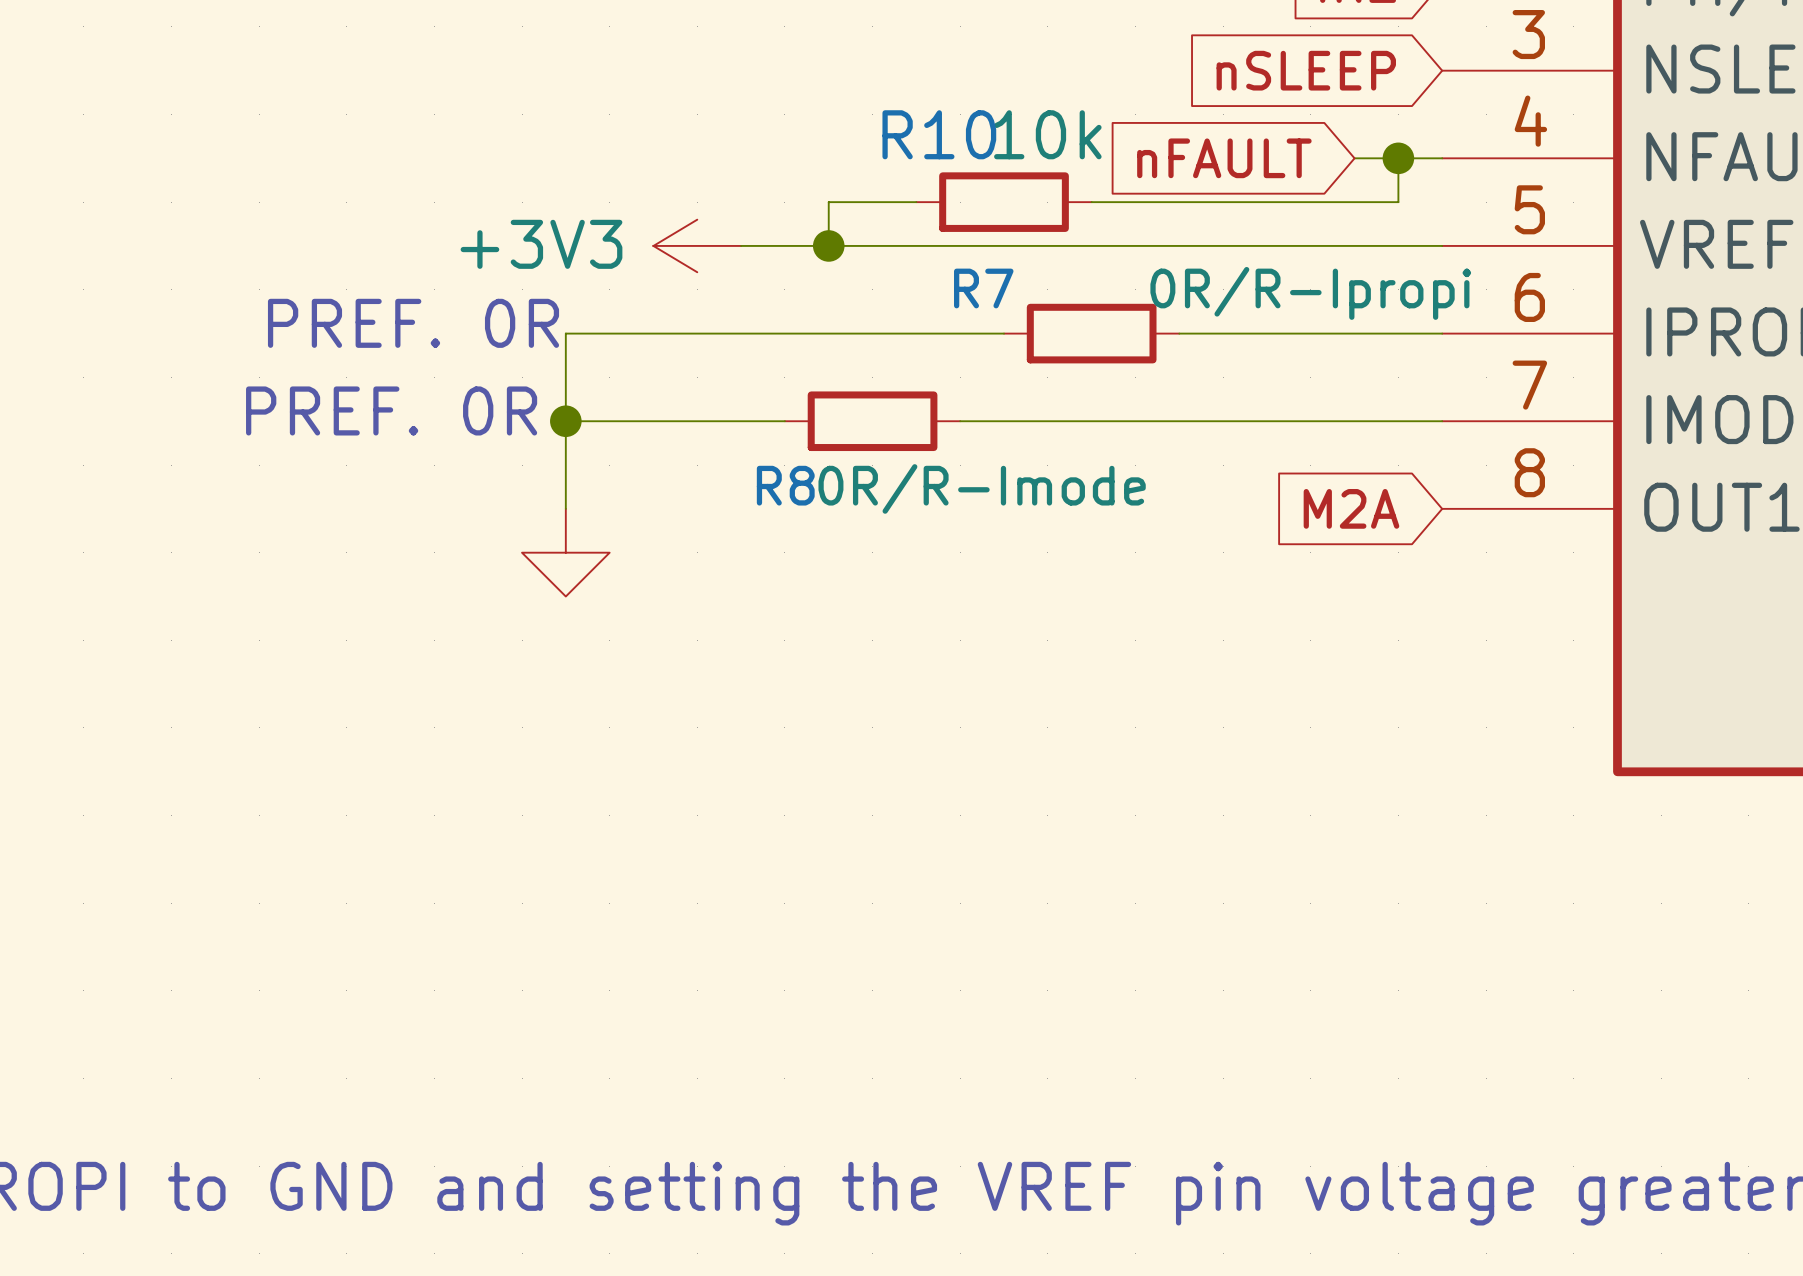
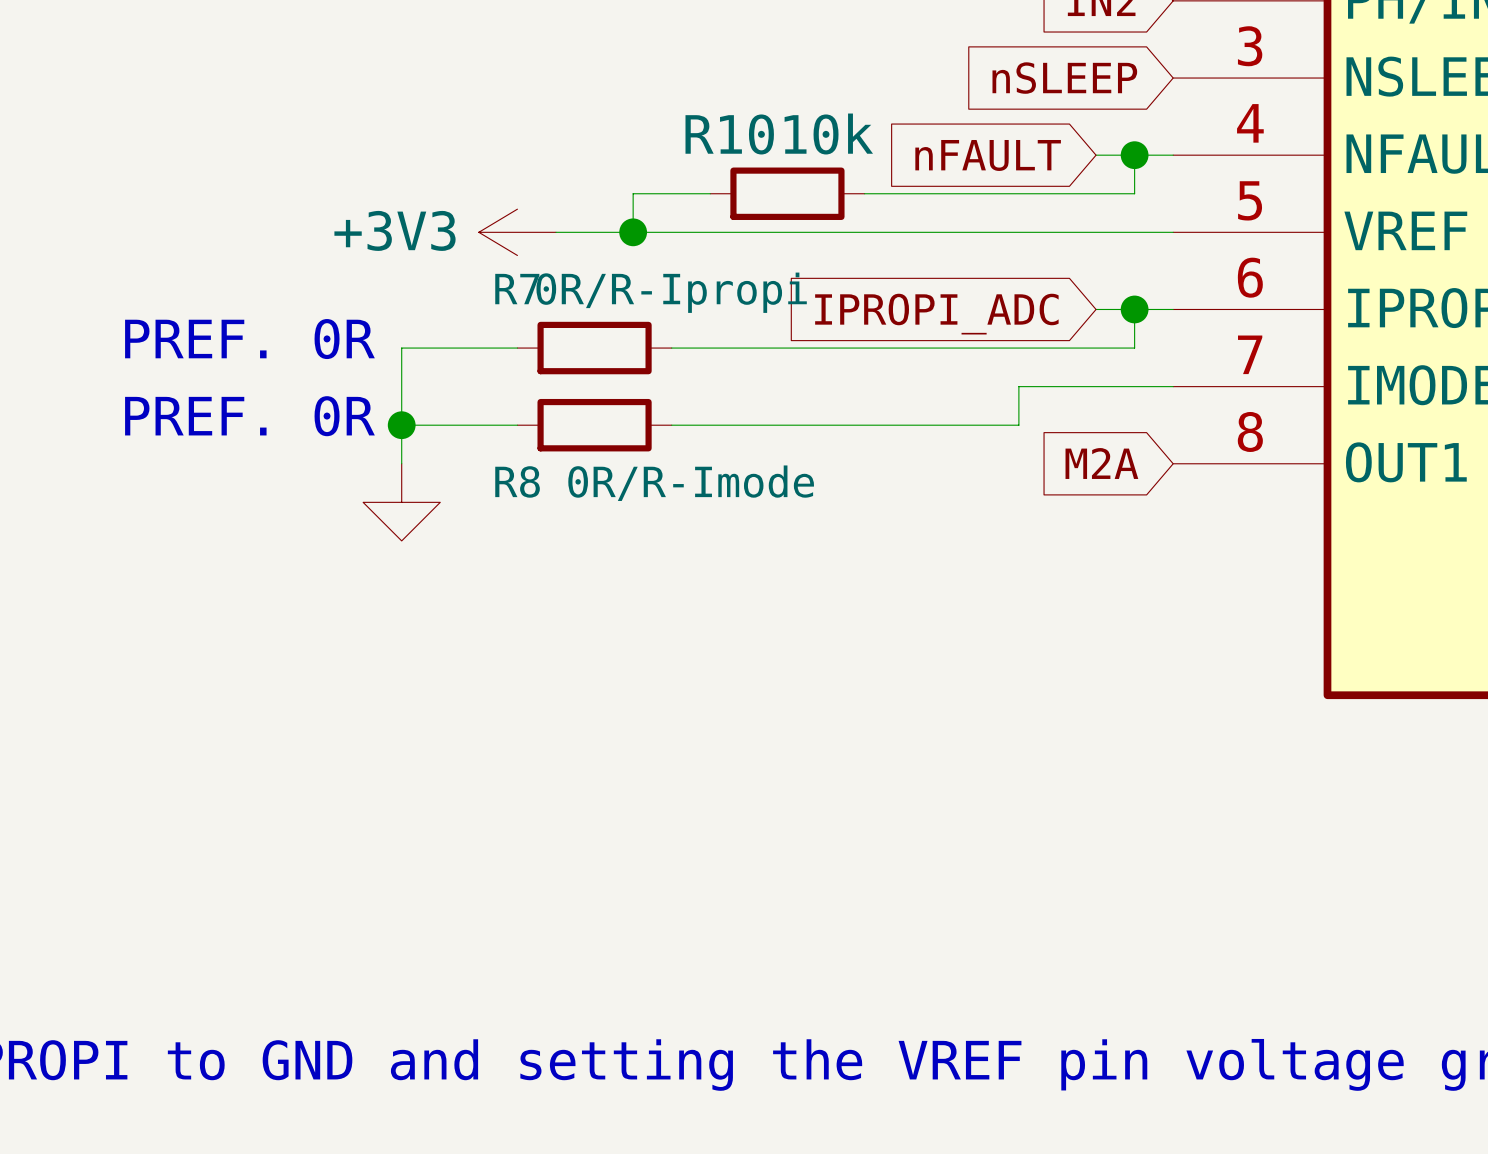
R7 name position: R7 (983, 288) -> R7 (517, 289)
R7 value position: 0R/R-Ipropi (1310, 293) -> 0R/R-Ipropi (671, 292)
text: PREF. 0R (413, 323) -> none
wire: (1004, 333) (565, 333) (565, 377) -> (517, 348) (401, 348)
R7 position: (1091, 333) -> (594, 348)
wire: (1179, 333) (1354, 333) -> none
wire: none -> (1134, 309) (1134, 348) (671, 348)
junction: none -> (1134, 309)
global label: none -> IPROPI_ADC (936, 314)
text: none -> PREF. 0R (249, 339)
text: PREF. 0R (391, 410) -> none
wire: (565, 421) (784, 421) -> none
junction position: (565, 421) -> (401, 425)
R8 position: (872, 421) -> (594, 425)
wire: (960, 421) (1266, 421) -> (671, 425) (1018, 425) (1018, 386)
text: none -> PREF. 0R (249, 416)
wire: none -> (401, 425) (517, 425)

